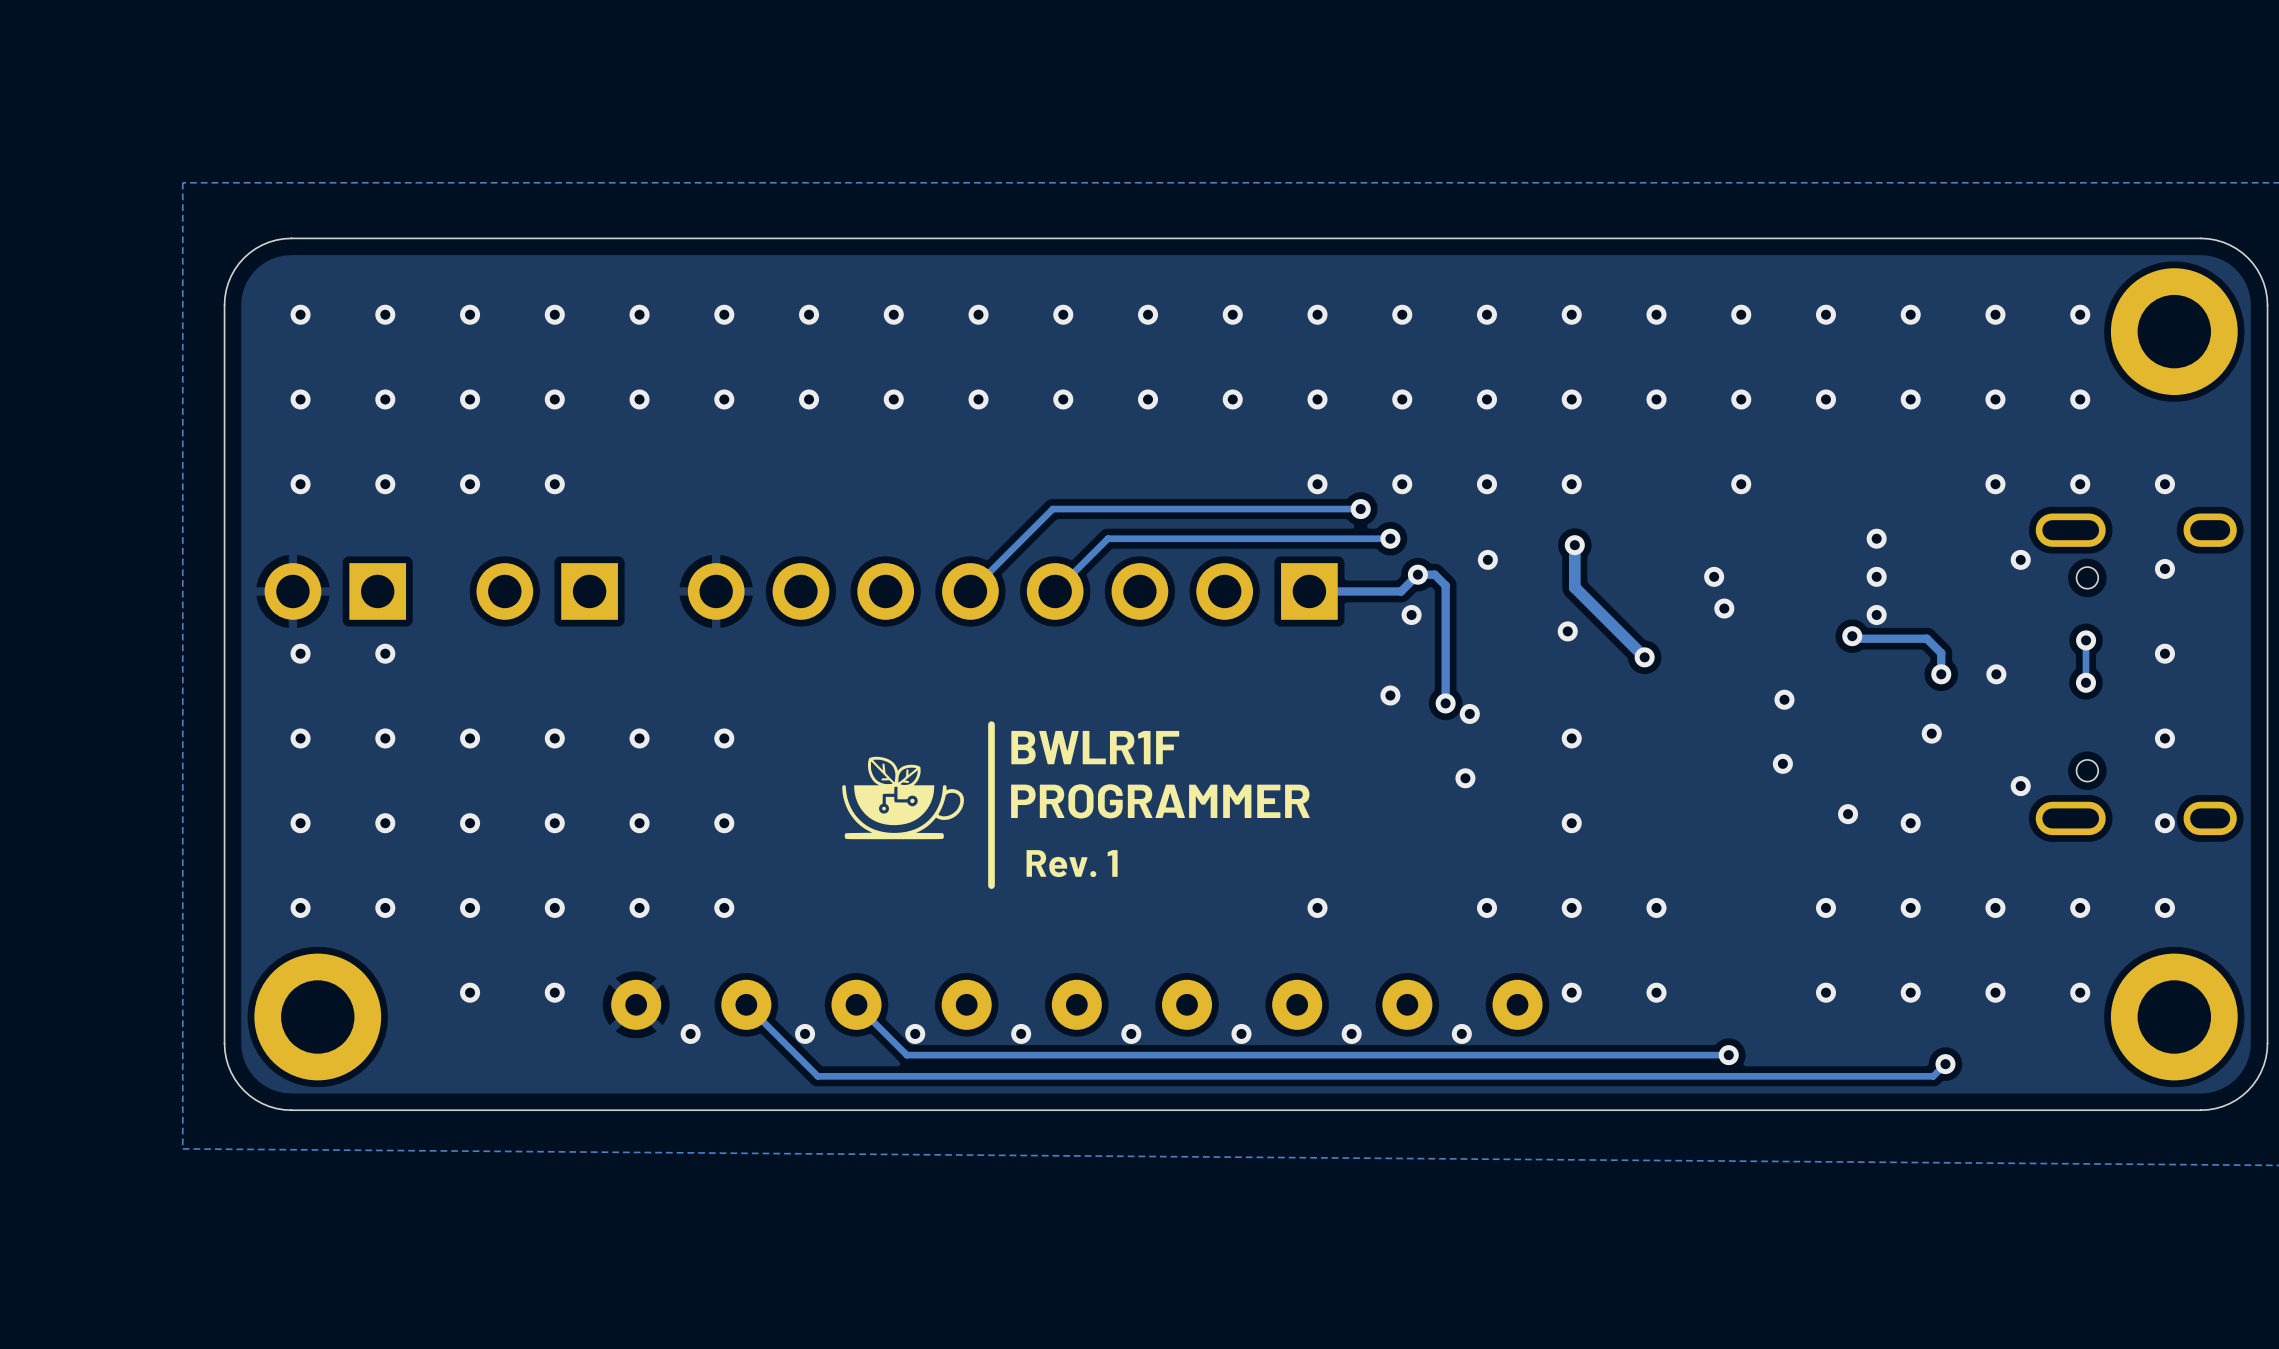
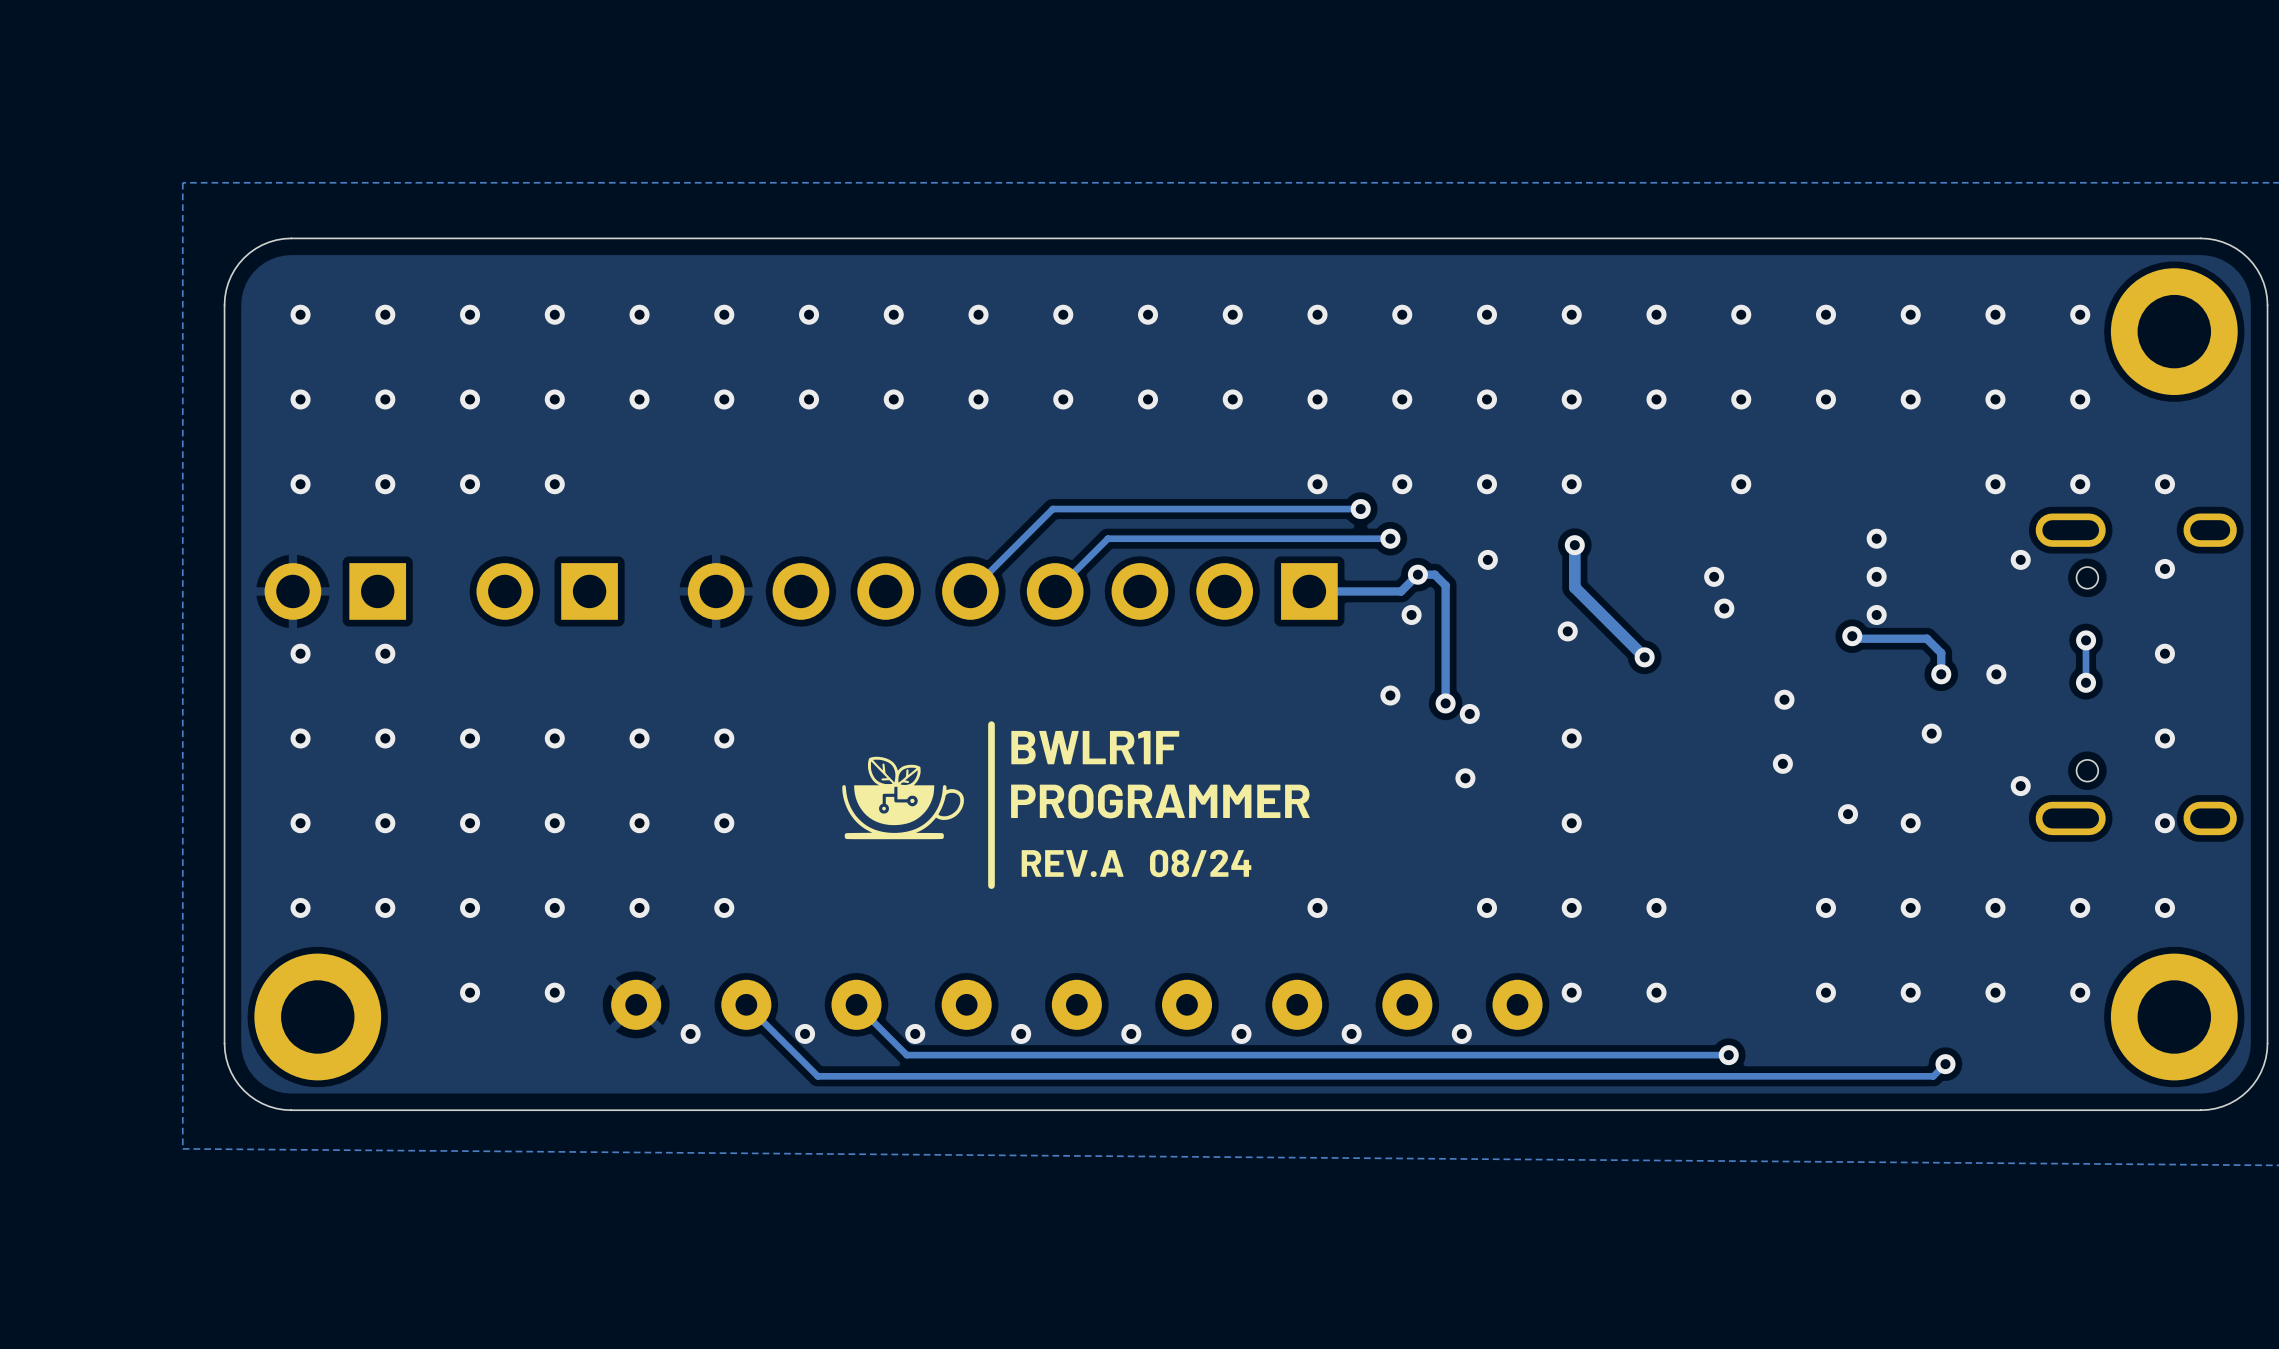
text: Rev. 1 (1072, 863) -> REV.A (1072, 863)
text: none -> 08/24 (1200, 863)

